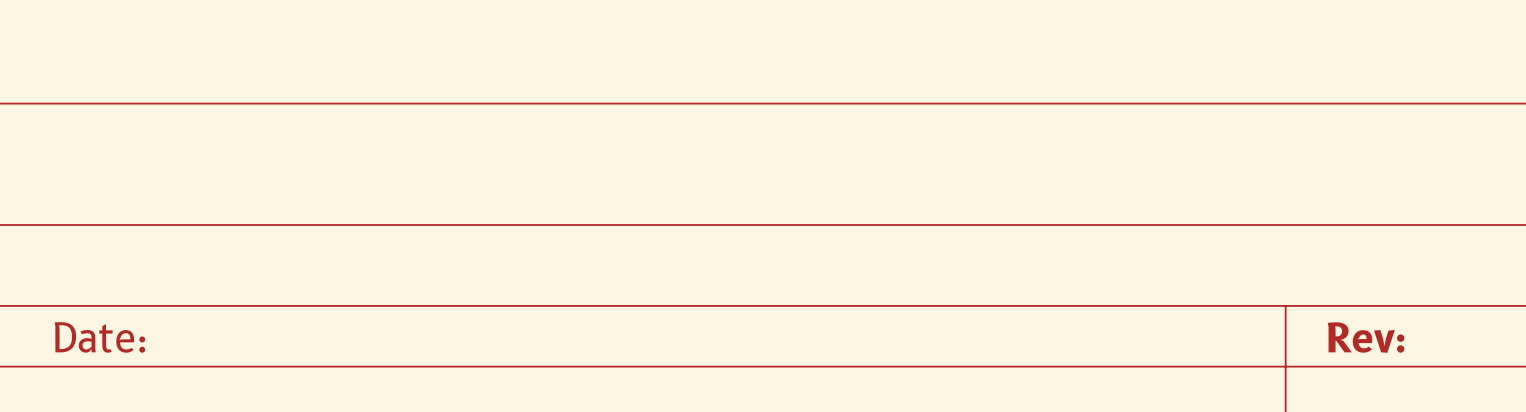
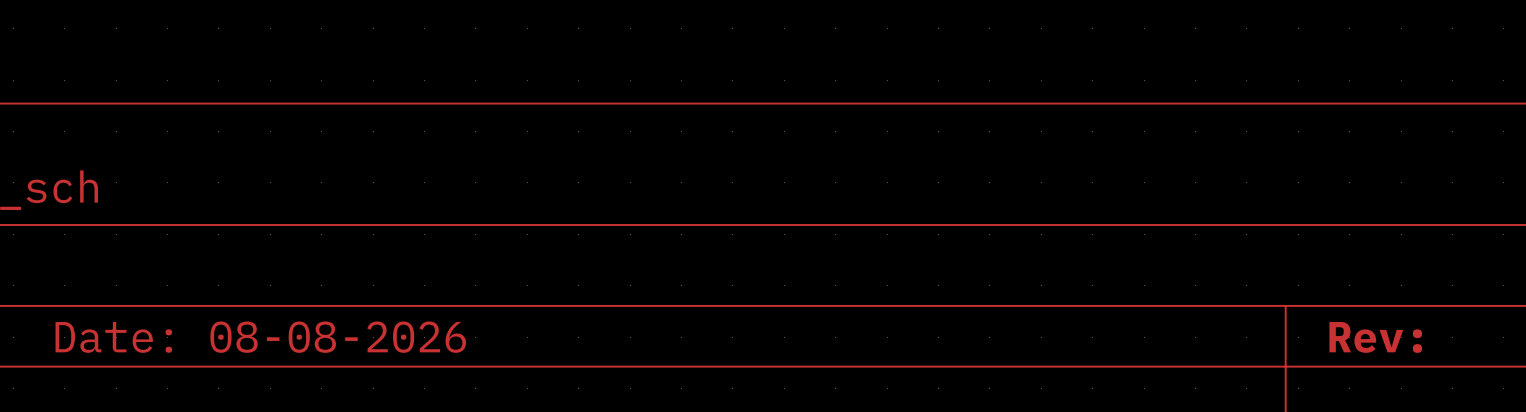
title block: Date: (99, 337) -> Date: 08-08-2026 (260, 337)

